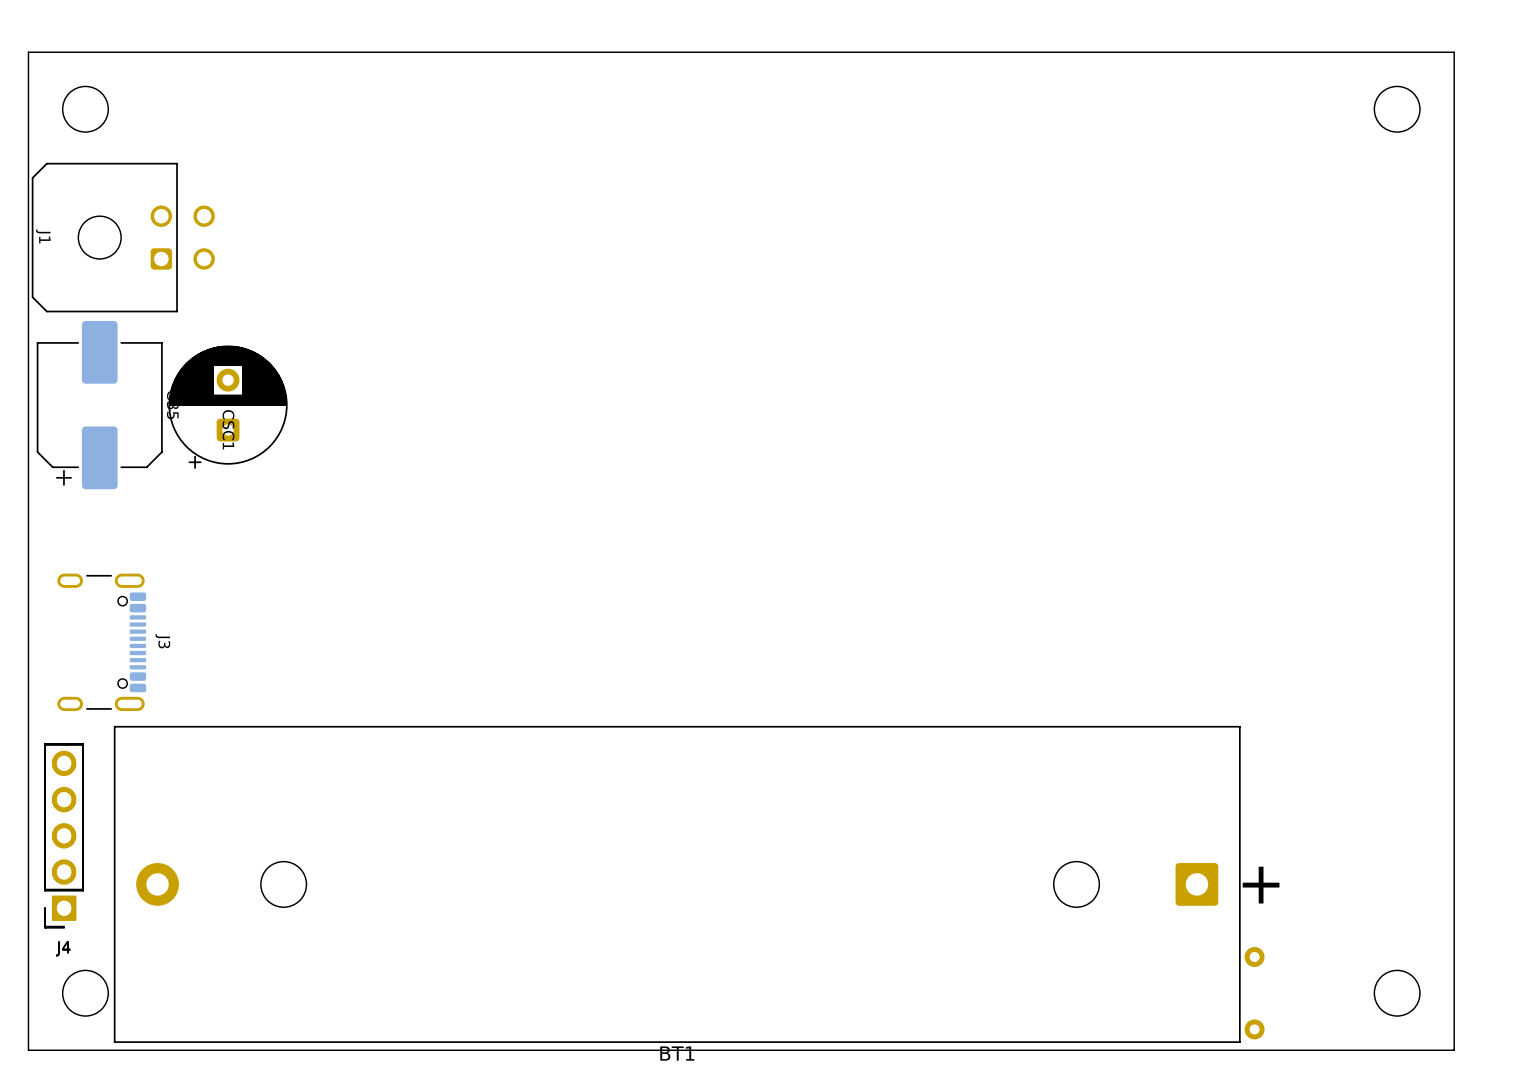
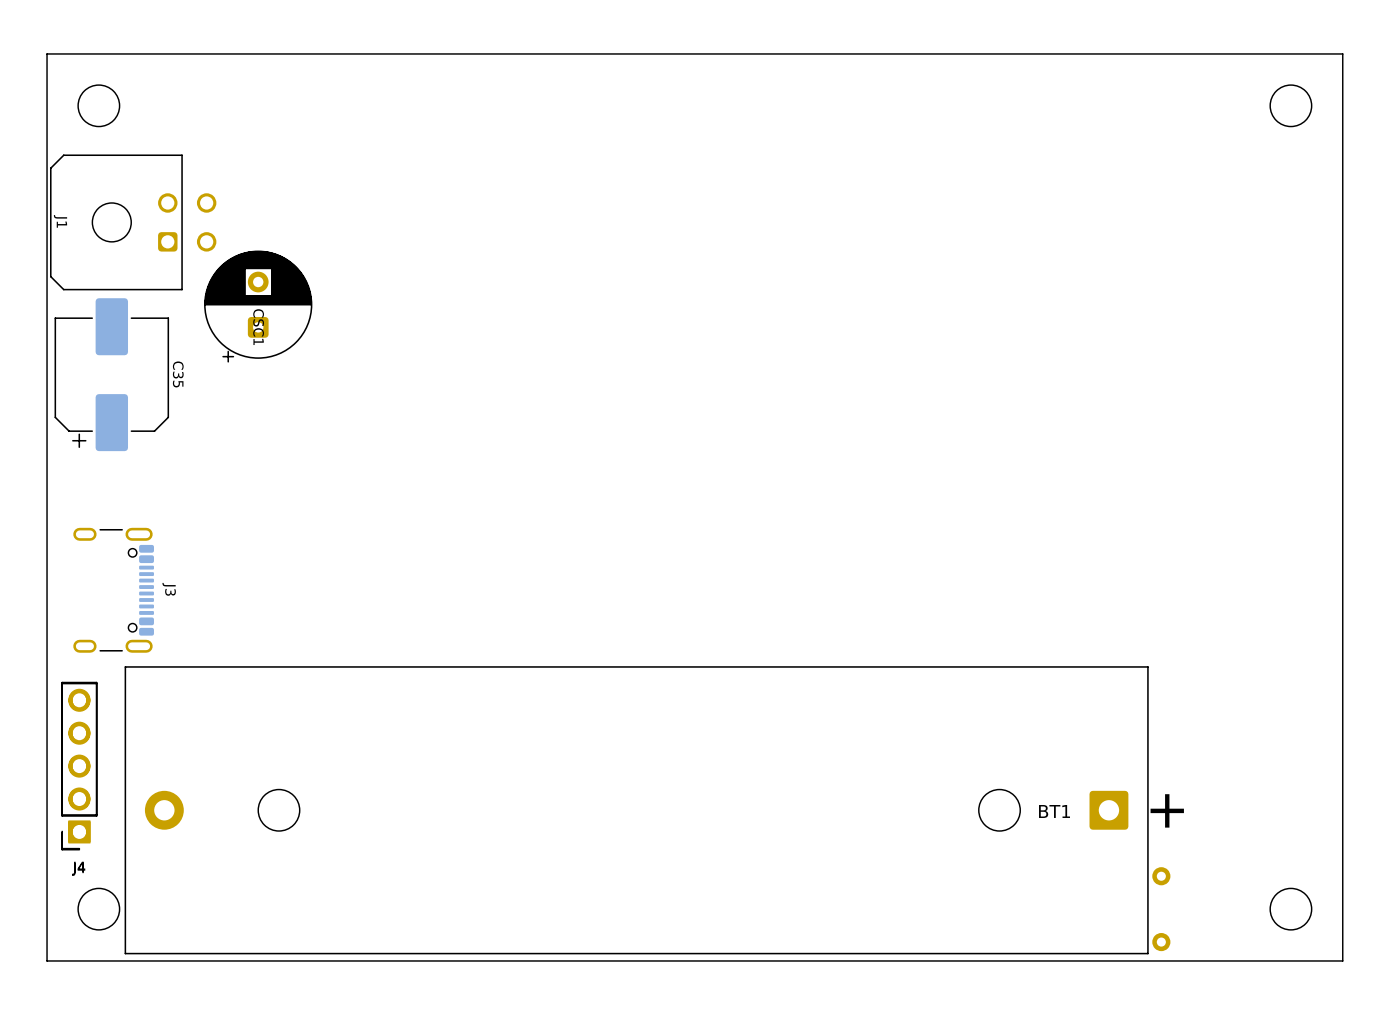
CSC1 position: (228, 407) -> (258, 306)
BT1 name position: BT1 (677, 1053) -> BT1 (1054, 811)

